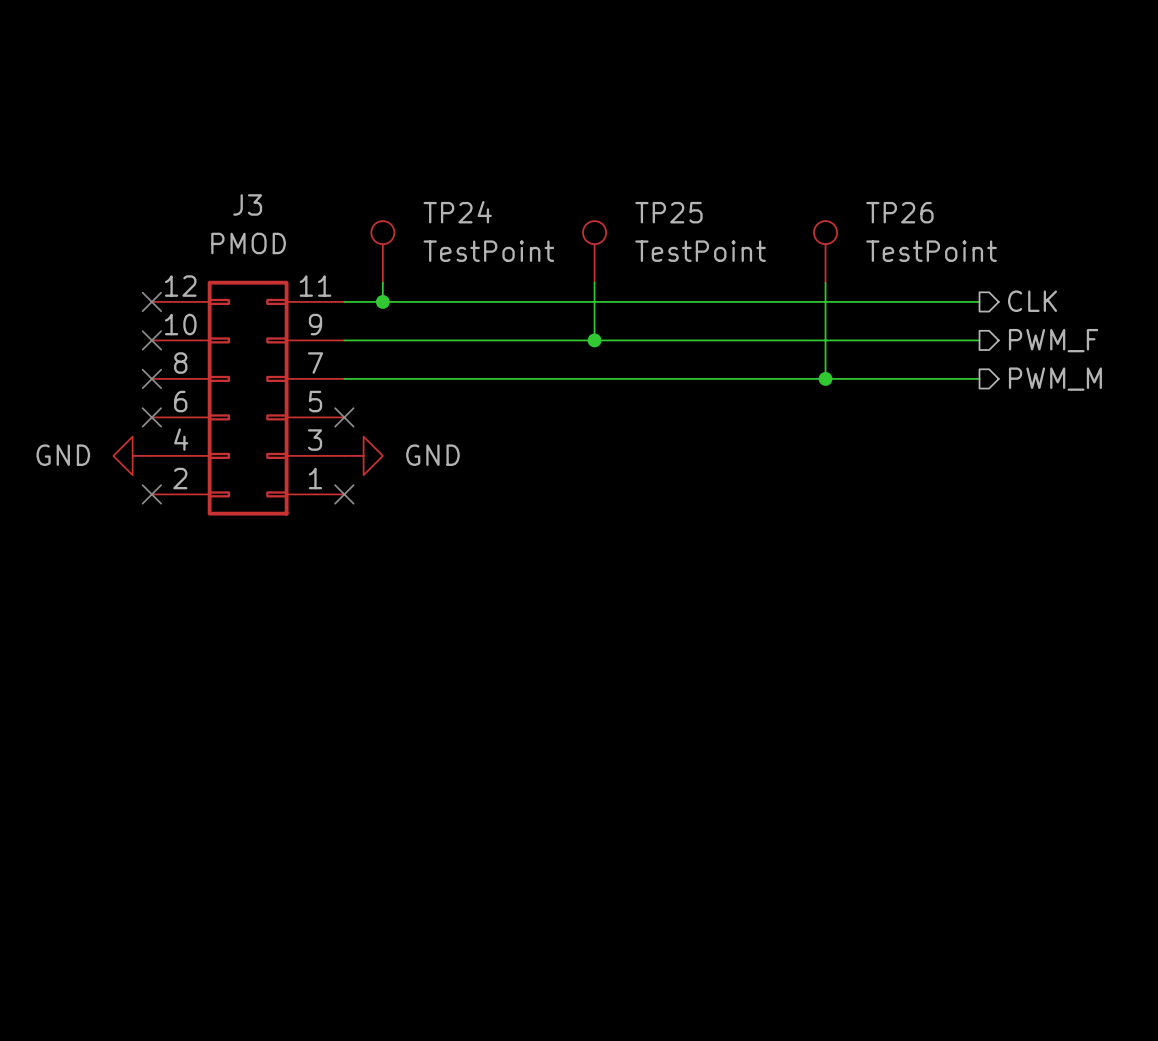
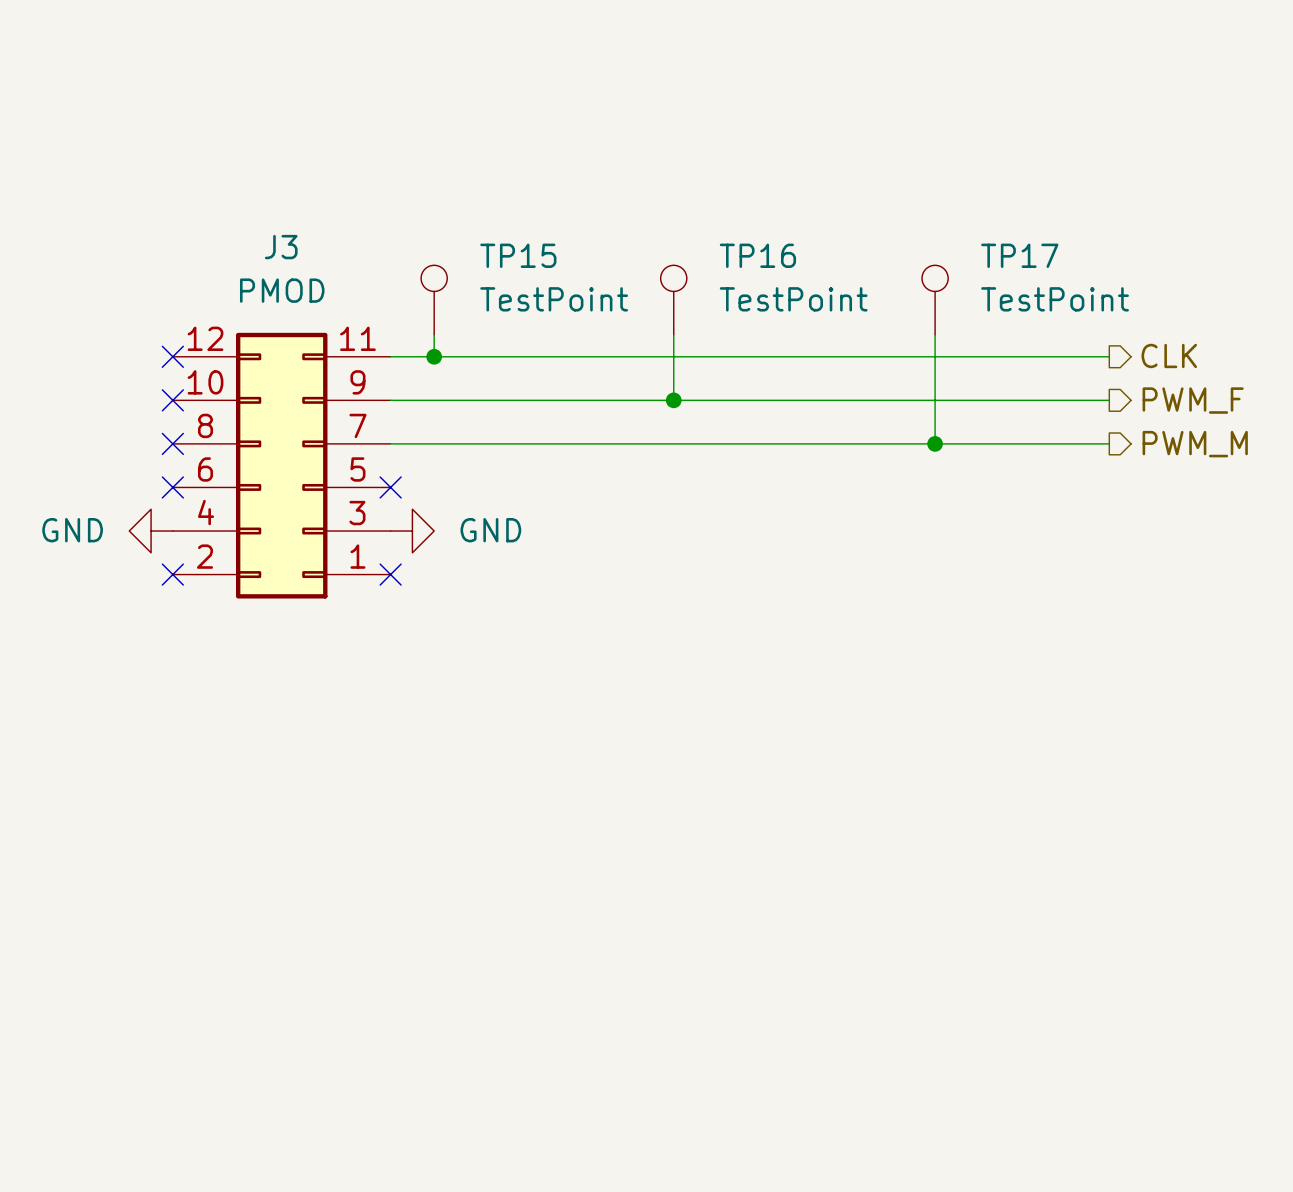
TP24 name: TP24 (457, 212) -> TP15 (518, 255)
TP25 name: TP25 (668, 212) -> TP16 (757, 255)
TP26 name: TP26 (899, 212) -> TP17 (1019, 255)

